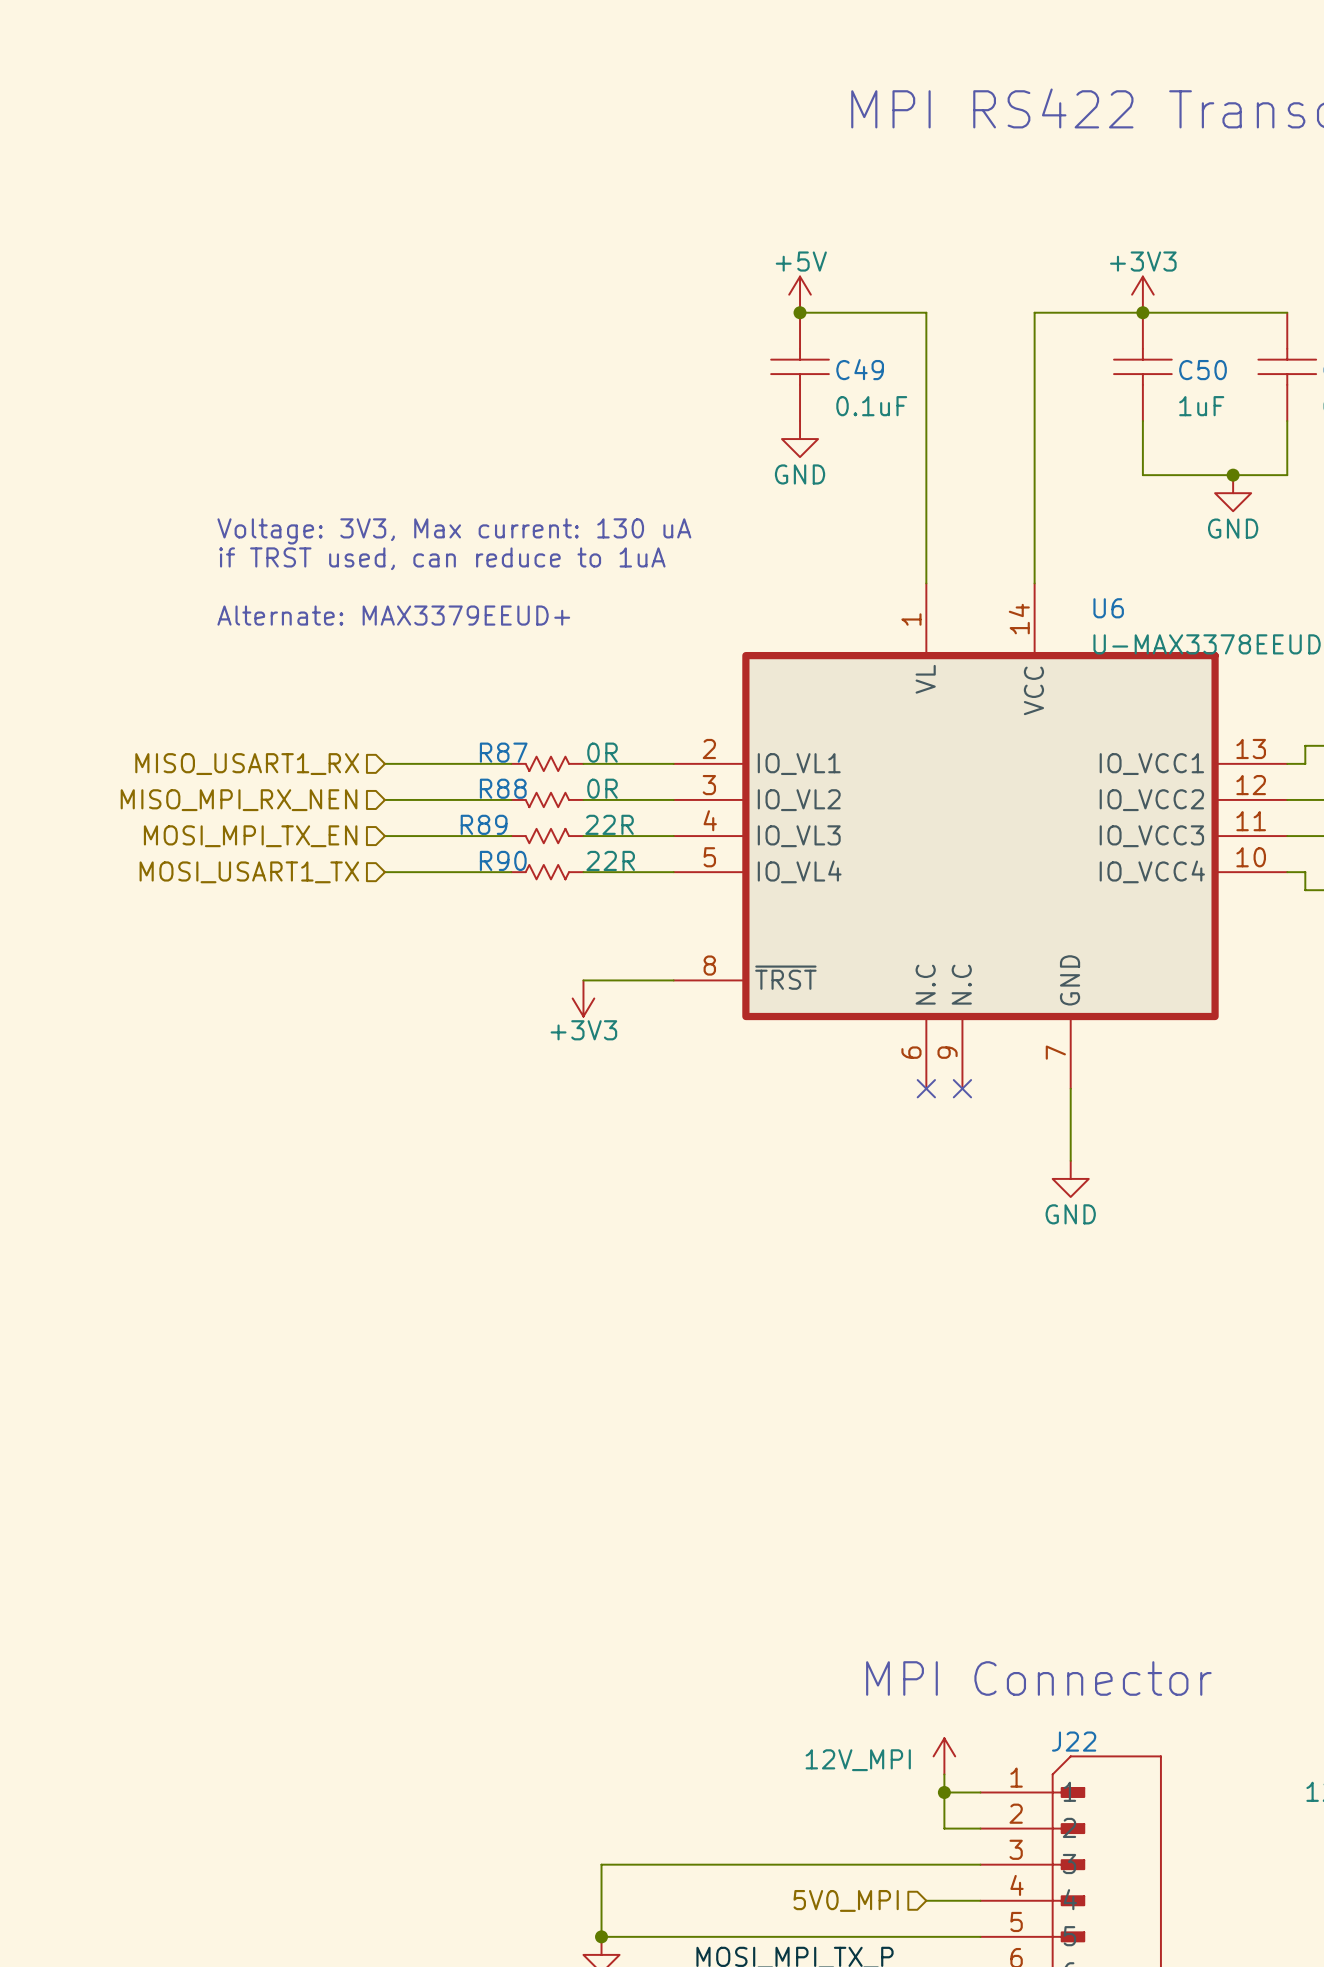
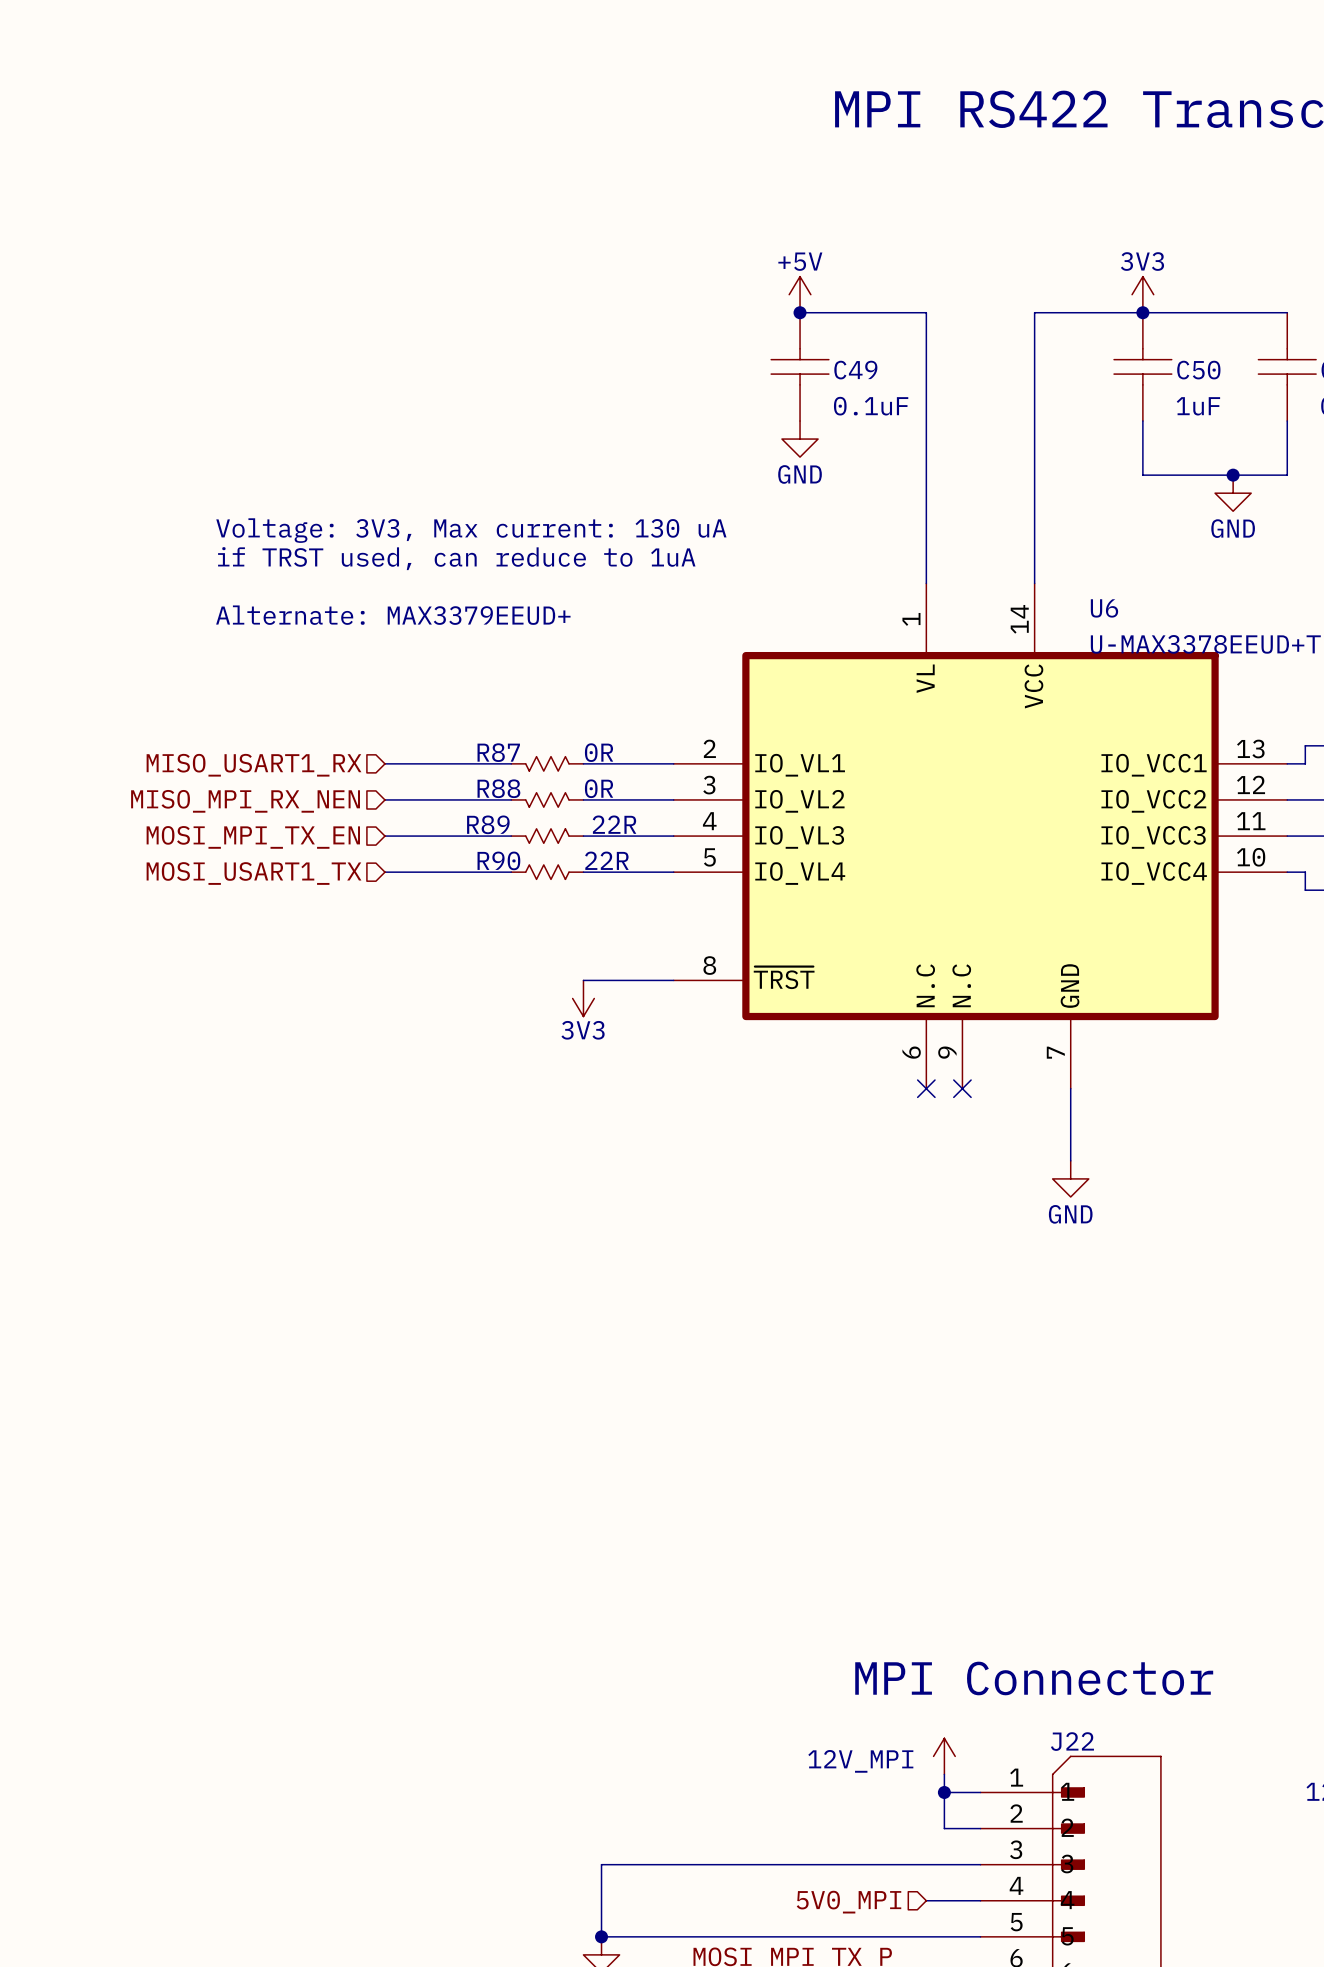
power symbol: +3V3 (1142, 294) -> 3V3 (1142, 294)
power symbol: +3V3 (583, 998) -> 3V3 (583, 998)

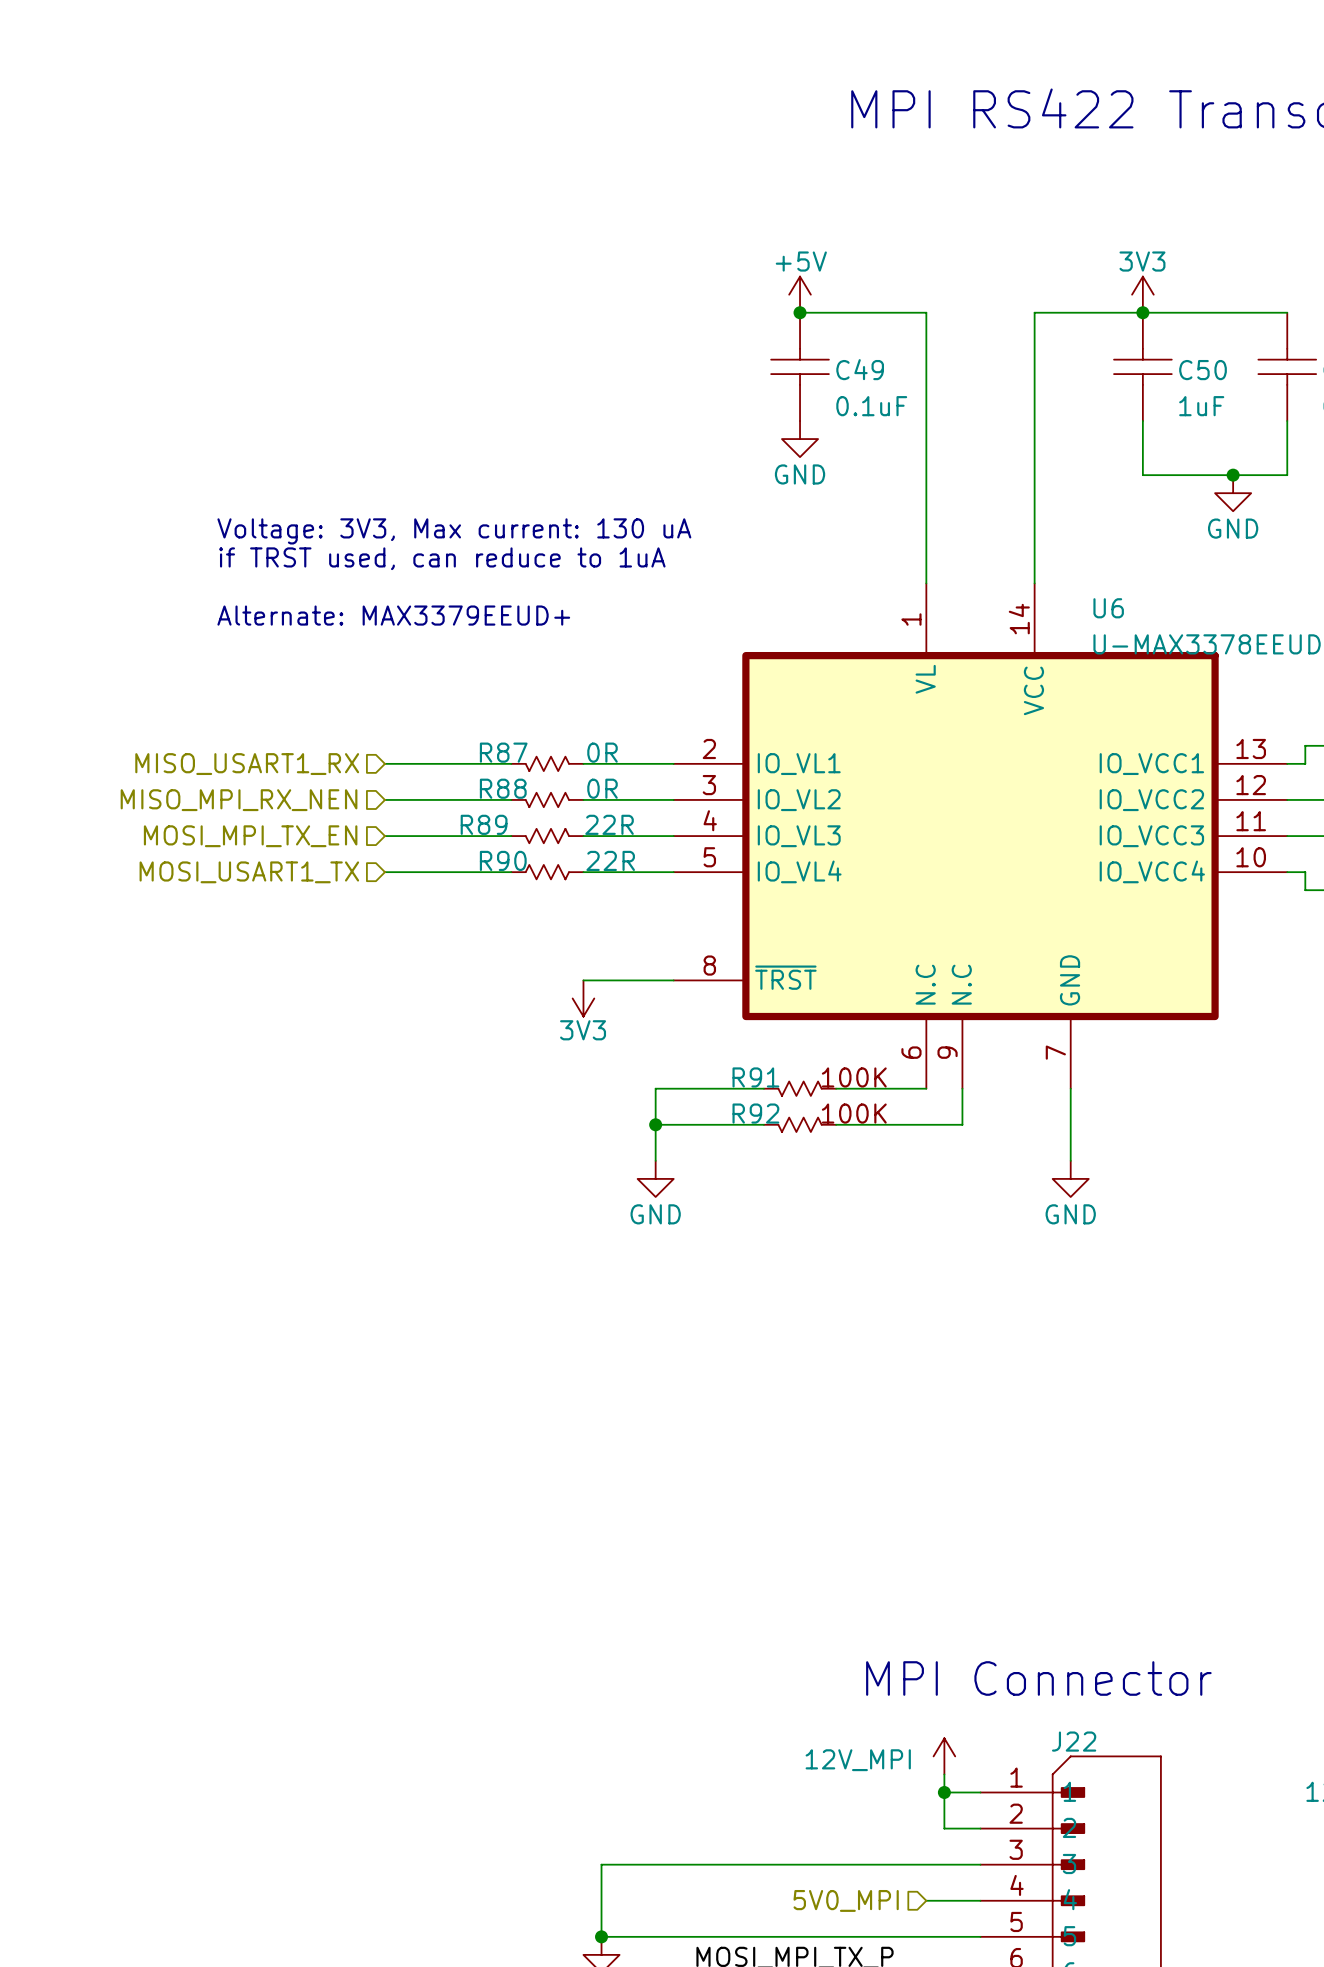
wire: none -> (763, 1088) (655, 1088) (655, 1160)
R91: none -> (800, 1088)
wire: none -> (836, 1088) (926, 1088)
no-connect mark: (926, 1088) -> none
wire: none -> (962, 1088) (962, 1124) (836, 1124)
no-connect mark: (962, 1088) -> none
wire: none -> (655, 1124) (763, 1124)
junction: none -> (655, 1124)
R92: none -> (800, 1124)
power symbol: none -> GND (655, 1178)

